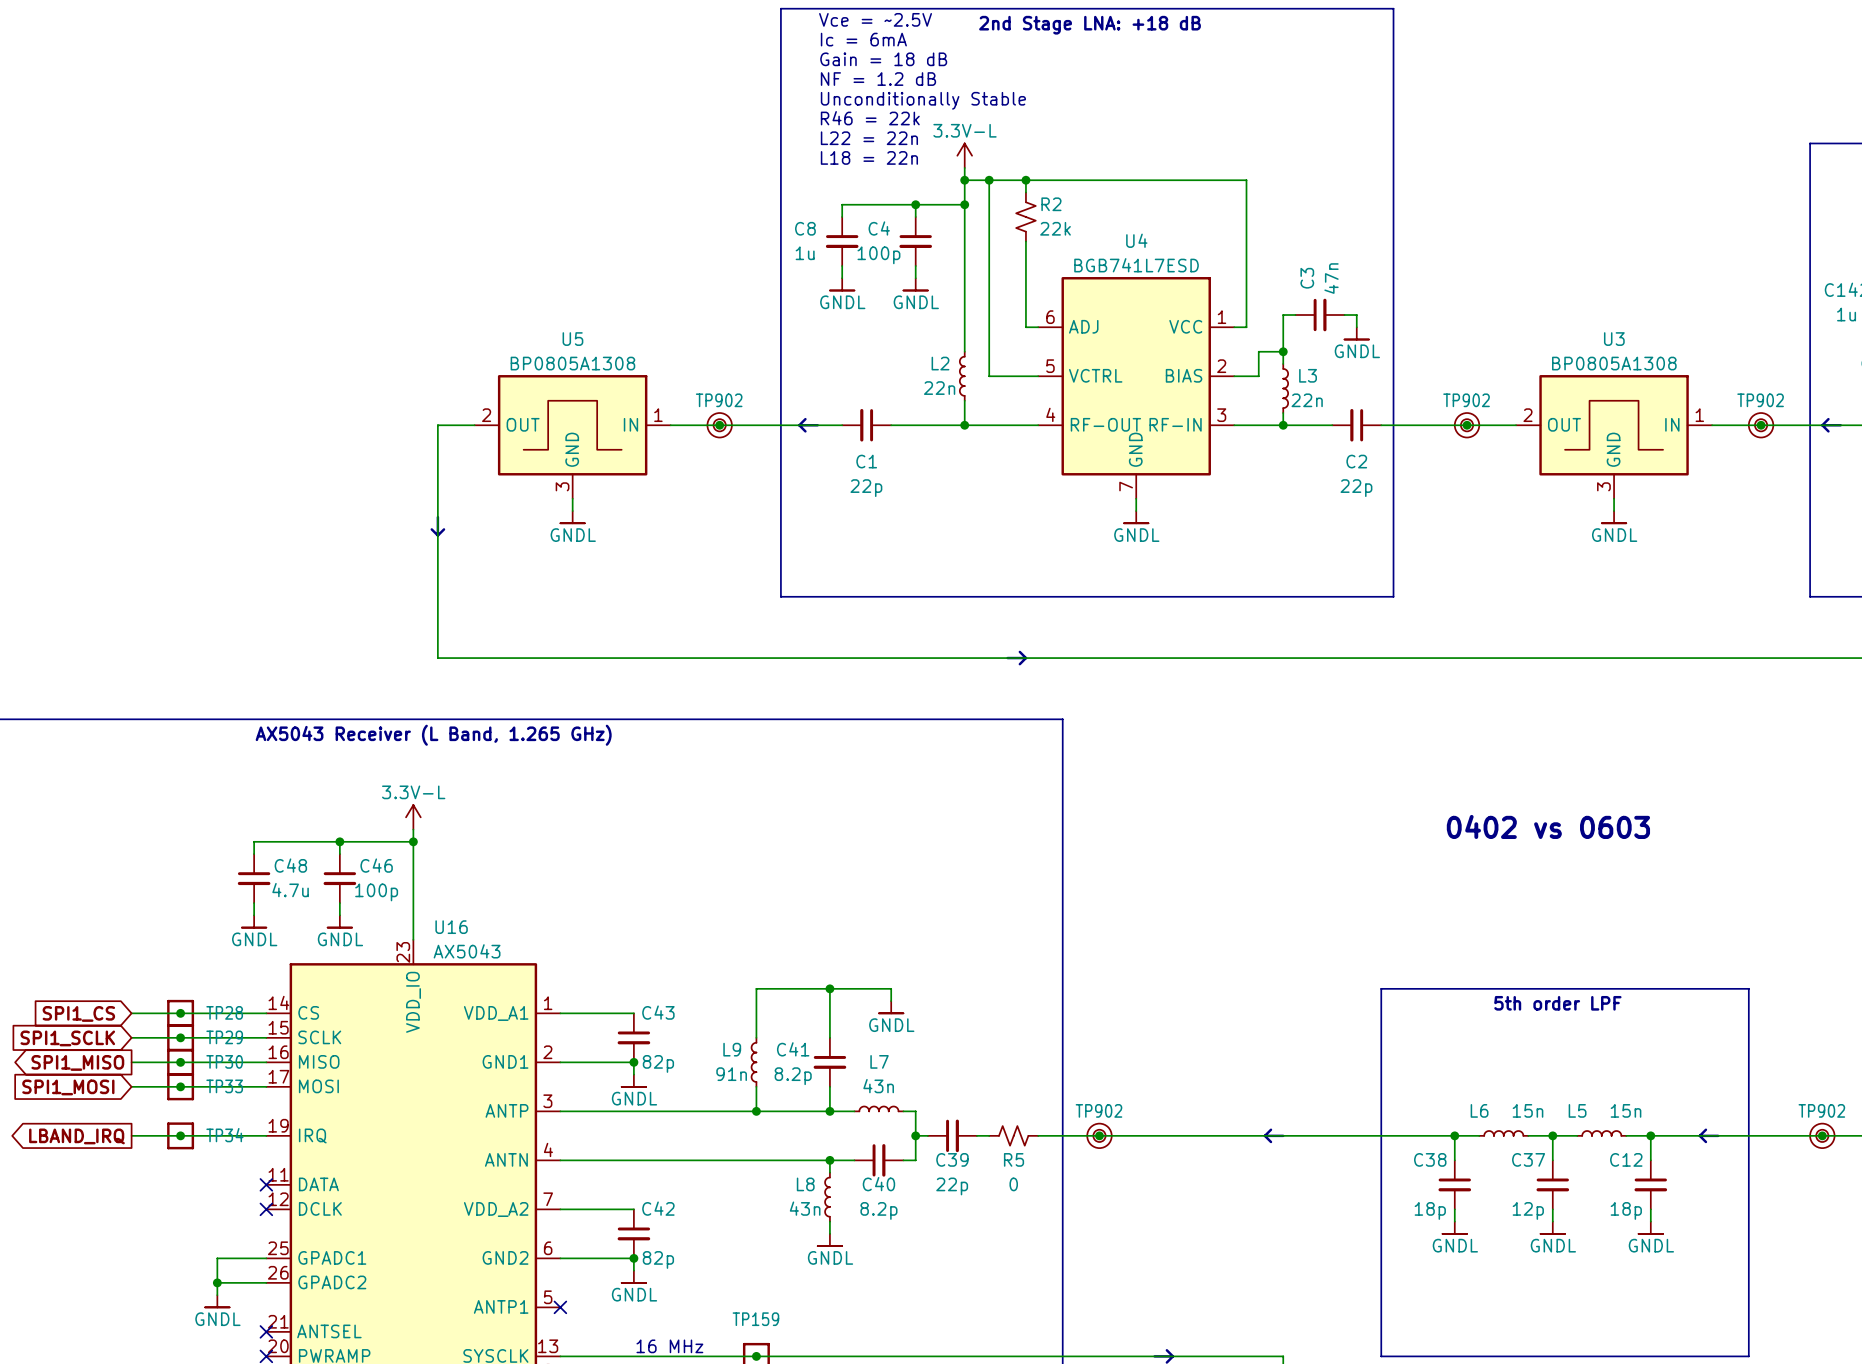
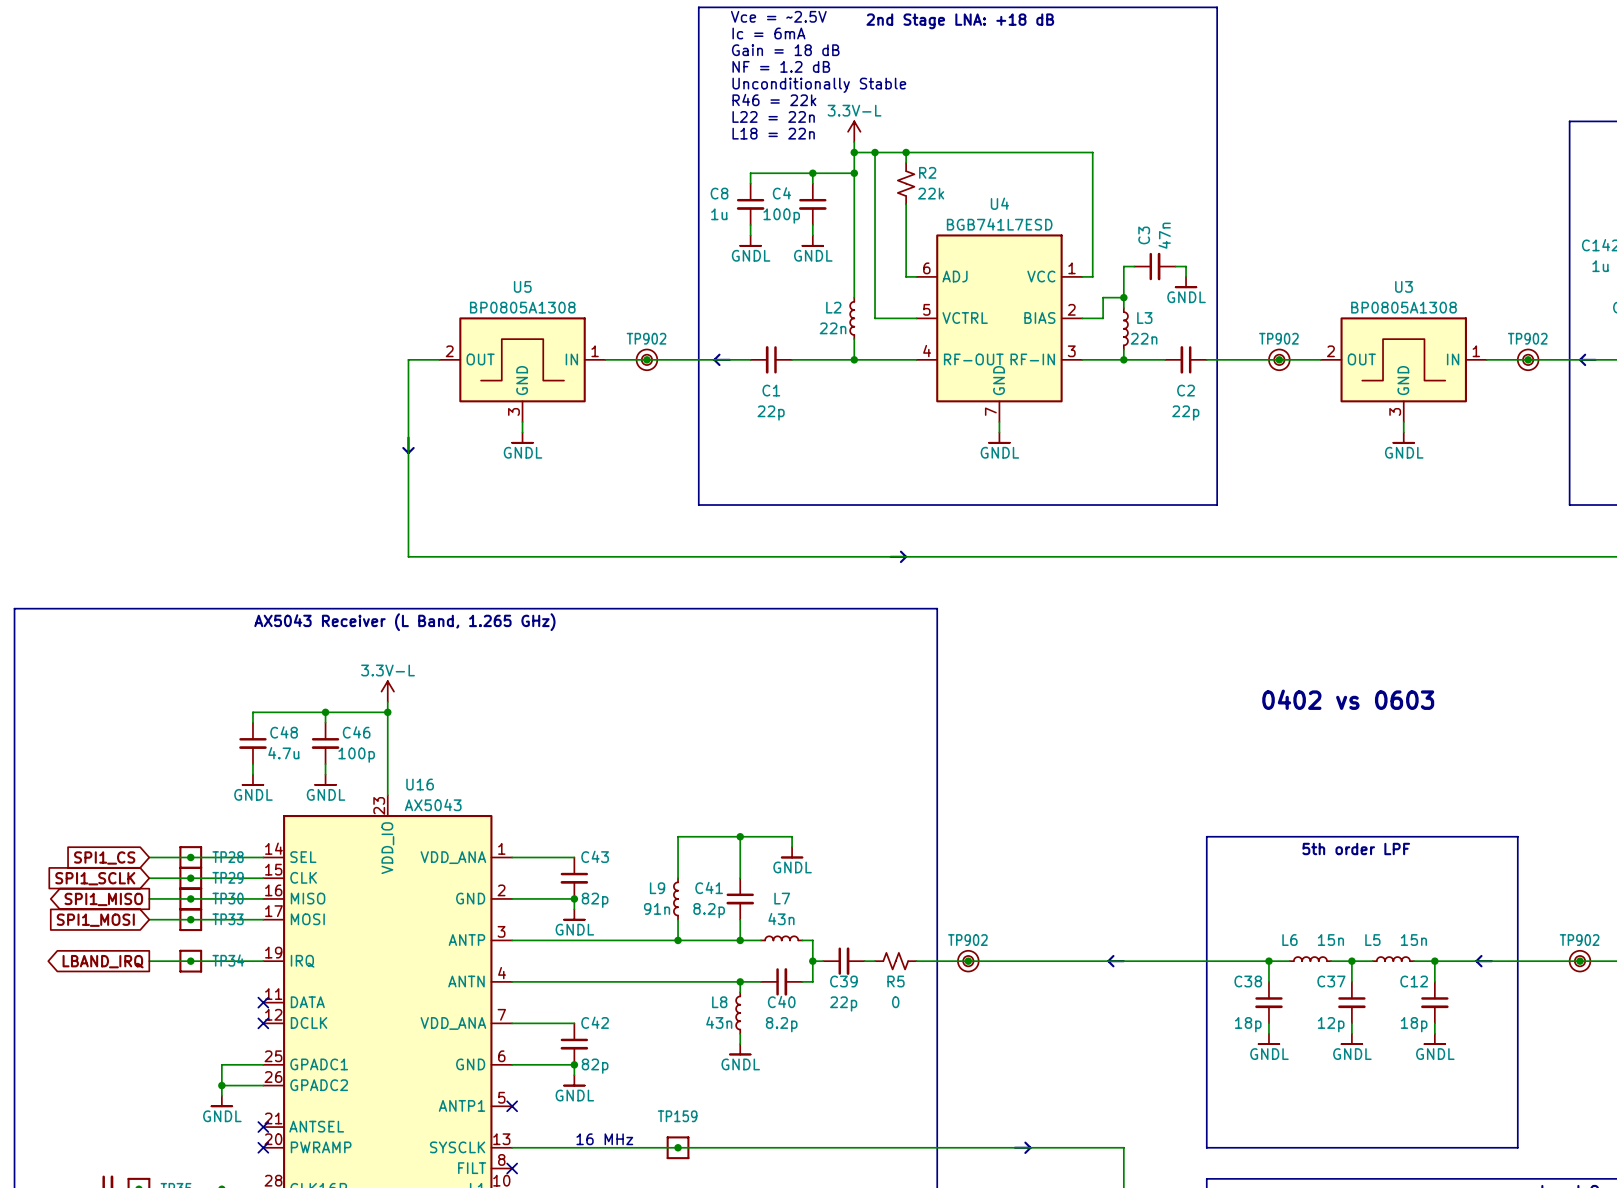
U16 pin name: CS (308, 1012) -> SEL (303, 857)
U16 pin name: VDD_A1 (496, 1013) -> VDD_ANA (453, 857)
U16 pin name: SCLK (319, 1037) -> CLK (303, 877)
U16 pin name: GND1 (505, 1061) -> GND (470, 898)
U16 pin name: VDD_A2 (496, 1209) -> VDD_ANA (453, 1023)
U16 pin name: GND2 (505, 1257) -> GND (470, 1064)

